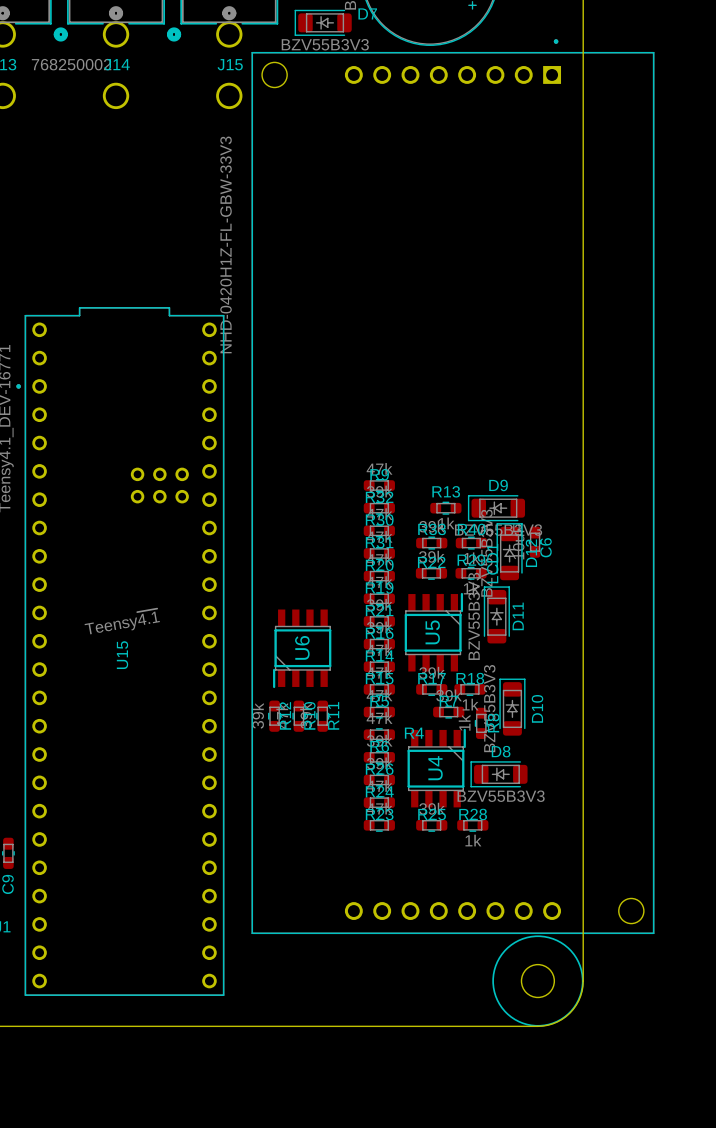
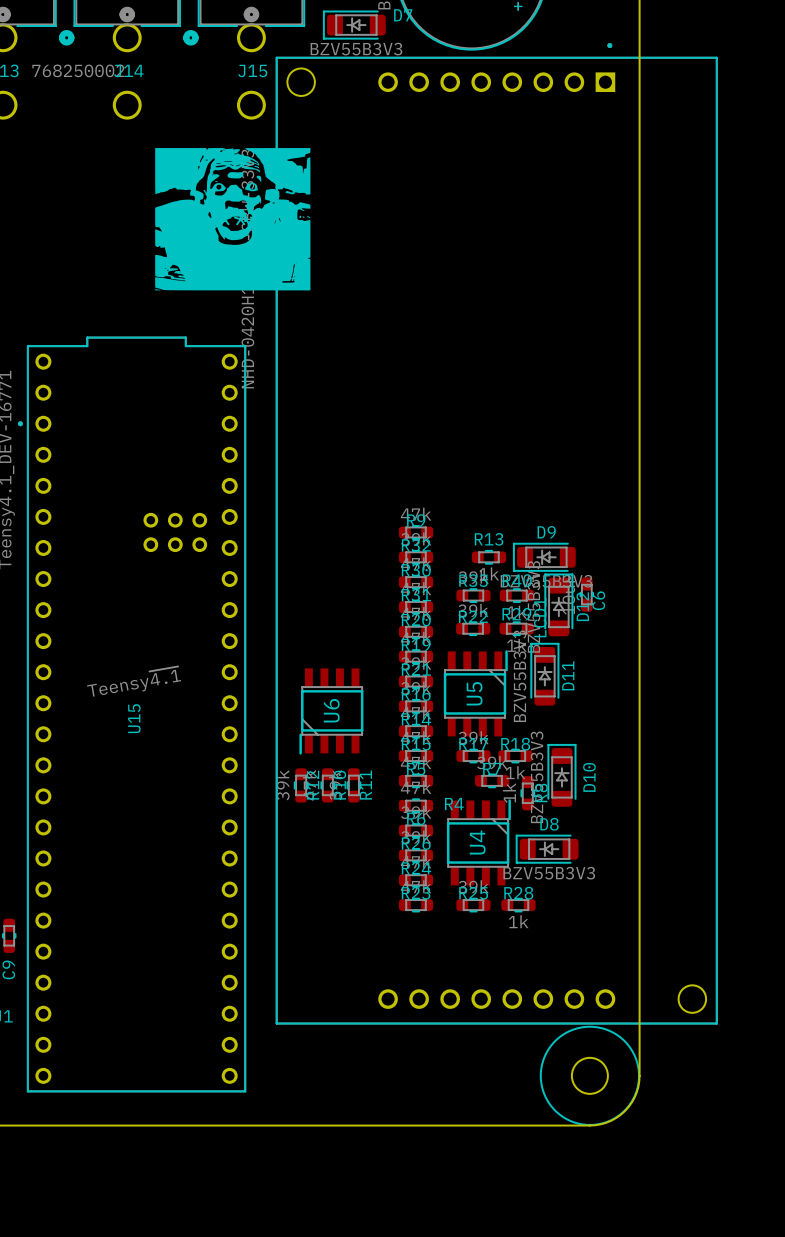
part: none -> (232, 219)

